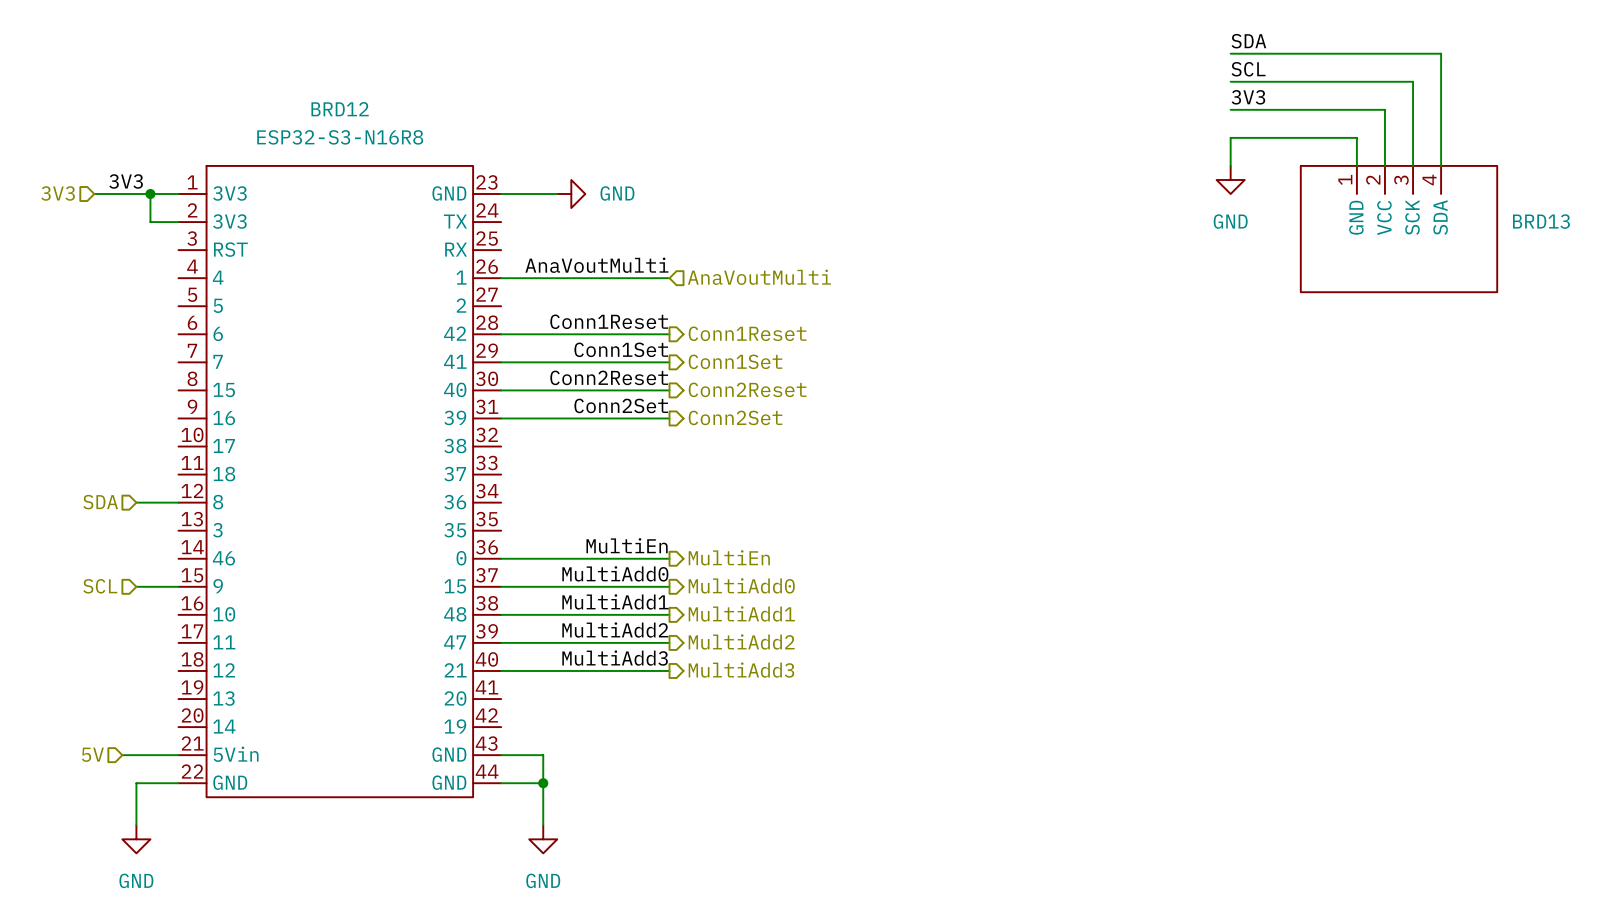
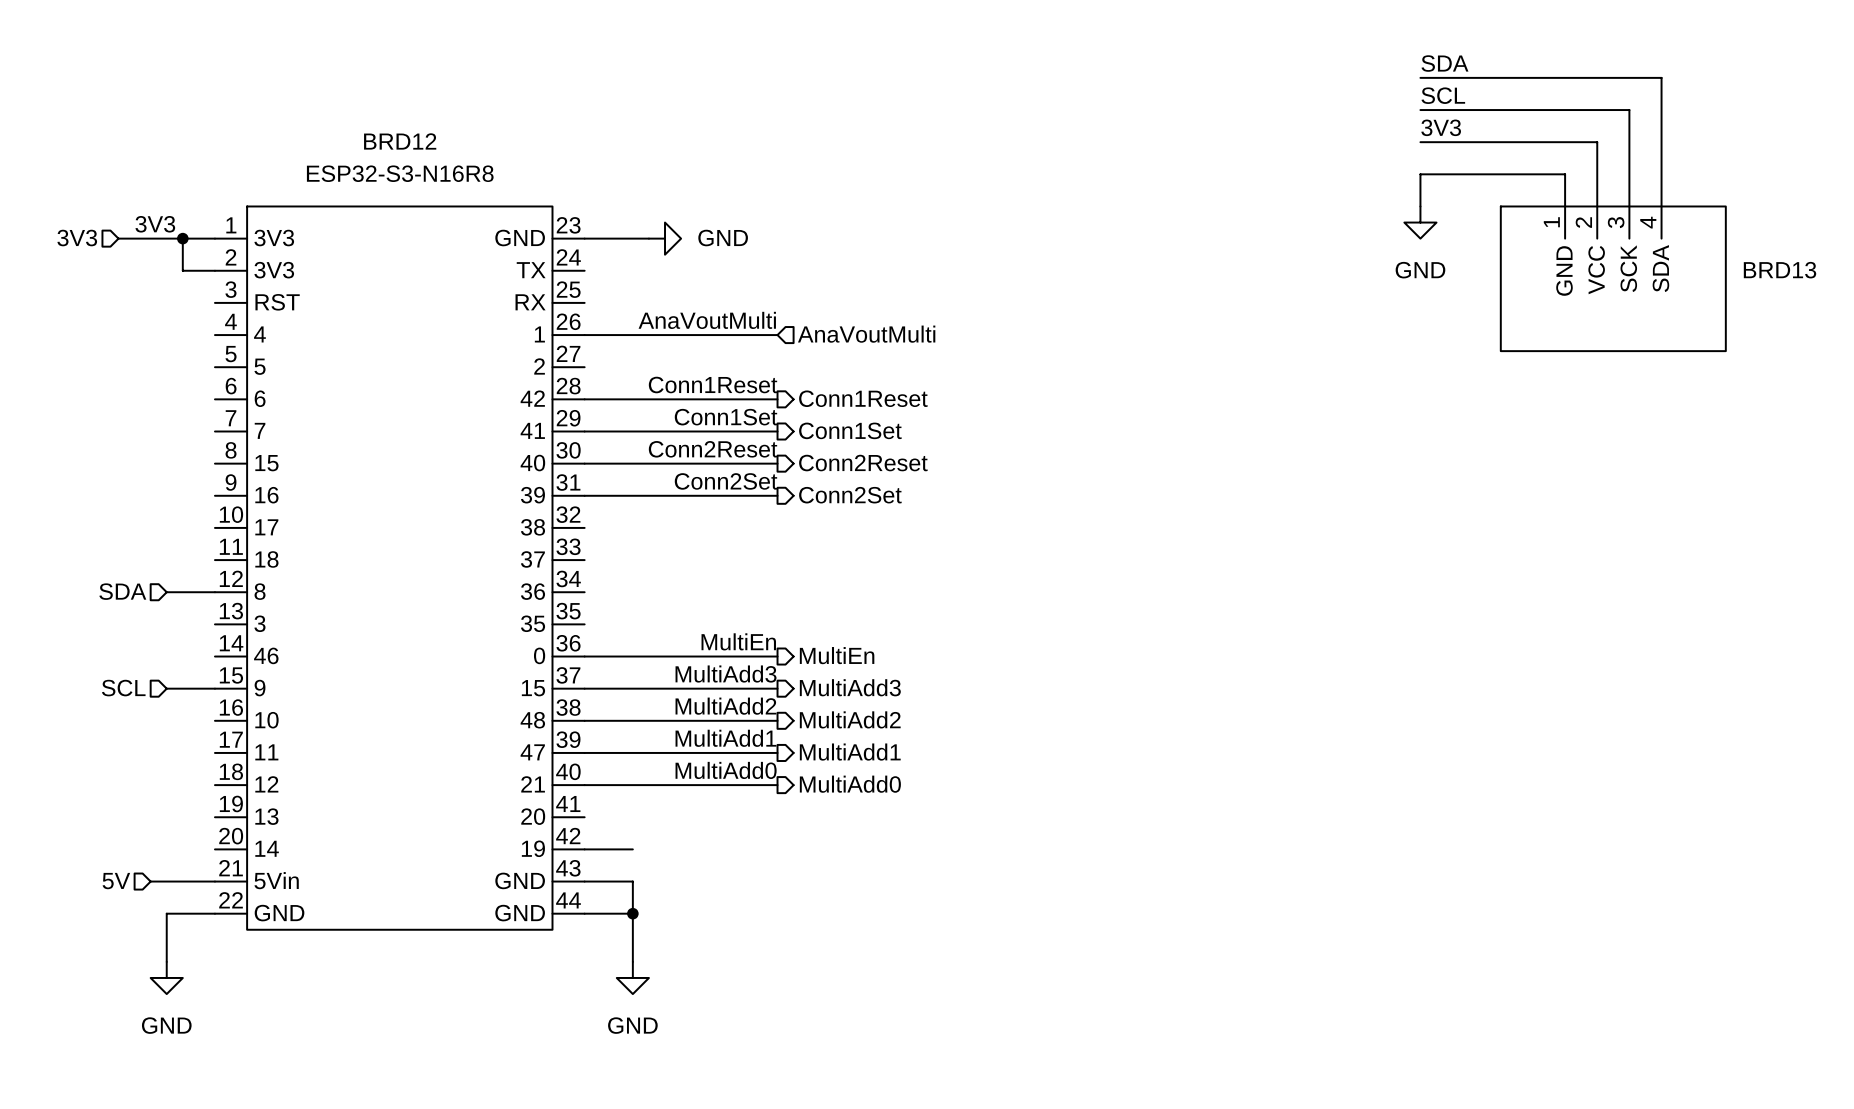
label: MultiAdd0 (615, 573) -> MultiAdd3 (726, 674)
hierarchical label: MultiAdd0 (741, 585) -> MultiAdd3 (850, 687)
label: MultiAdd1 (615, 601) -> MultiAdd2 (725, 706)
hierarchical label: MultiAdd1 (741, 613) -> MultiAdd2 (850, 719)
label: MultiAdd2 (615, 630) -> MultiAdd1 (725, 738)
hierarchical label: MultiAdd2 (741, 642) -> MultiAdd1 (850, 752)
label: MultiAdd3 (615, 658) -> MultiAdd0 (726, 770)
hierarchical label: MultiAdd3 (741, 670) -> MultiAdd0 (850, 784)
wire: none -> (584, 849) (632, 849)

